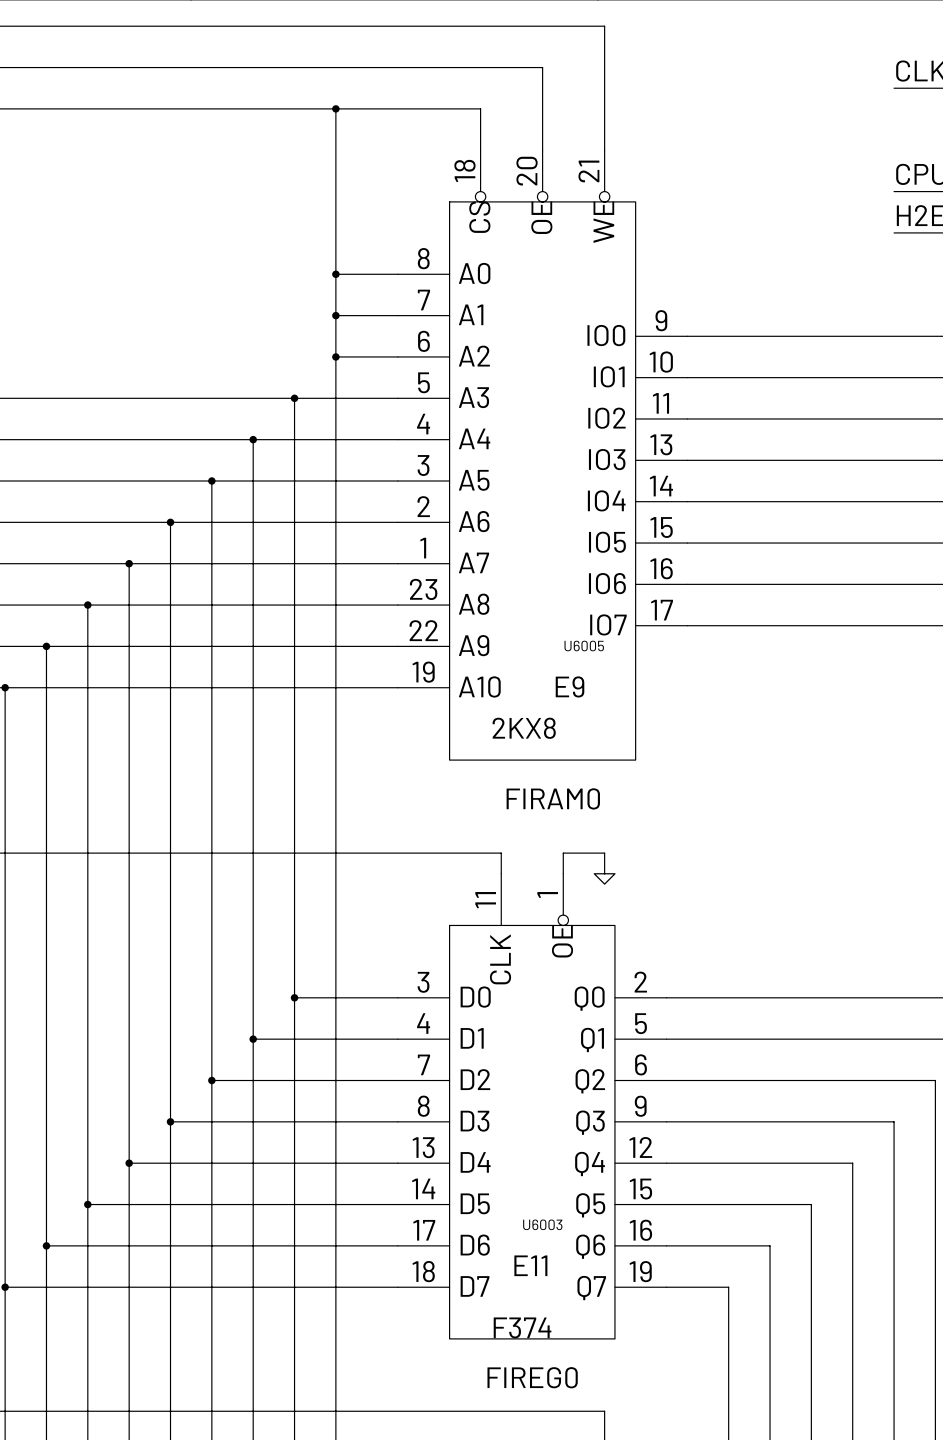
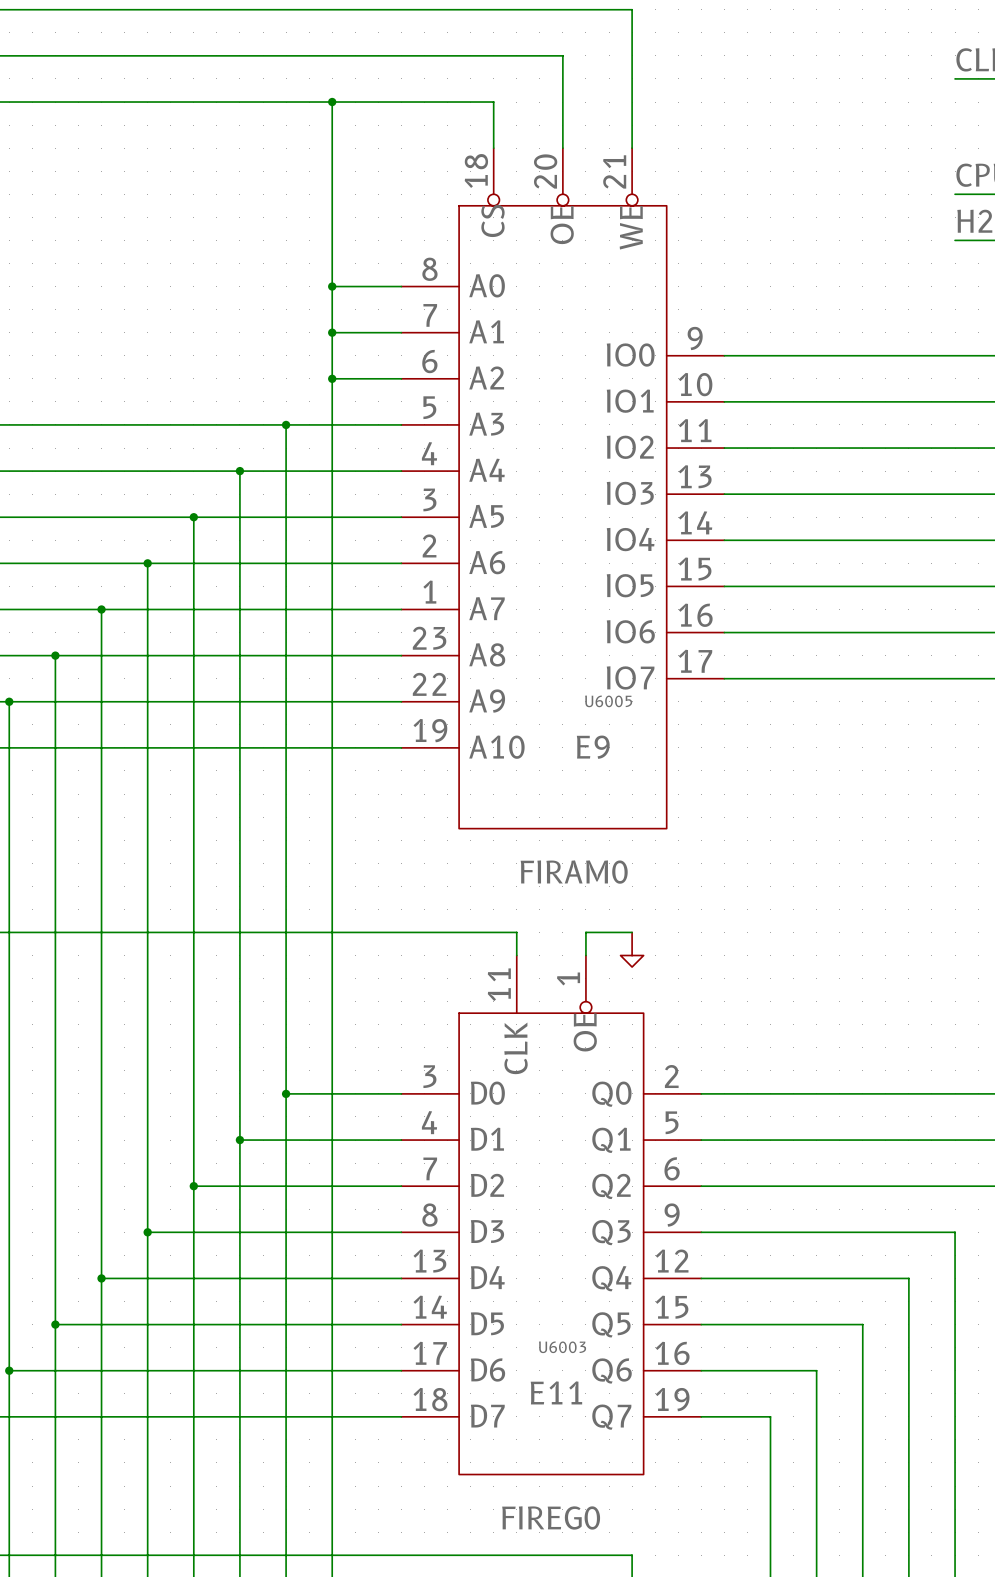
U6005 value: 2KX8 (524, 728) -> none
U6003 value: F374 (522, 1327) -> none

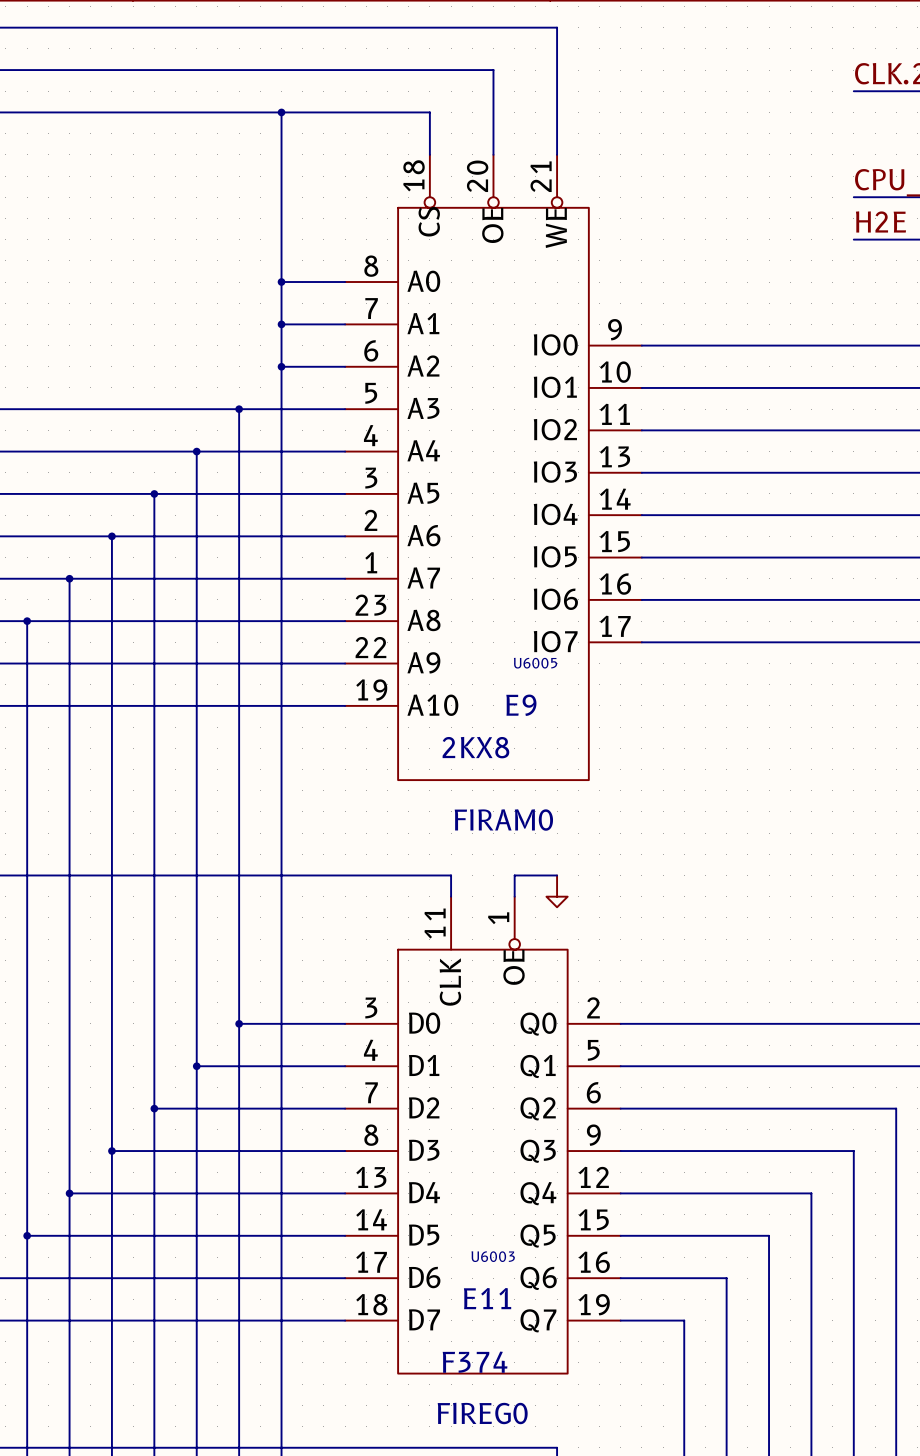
U6005 value: none -> 2KX8 (475, 747)
U6003 value: none -> F374 (475, 1362)

